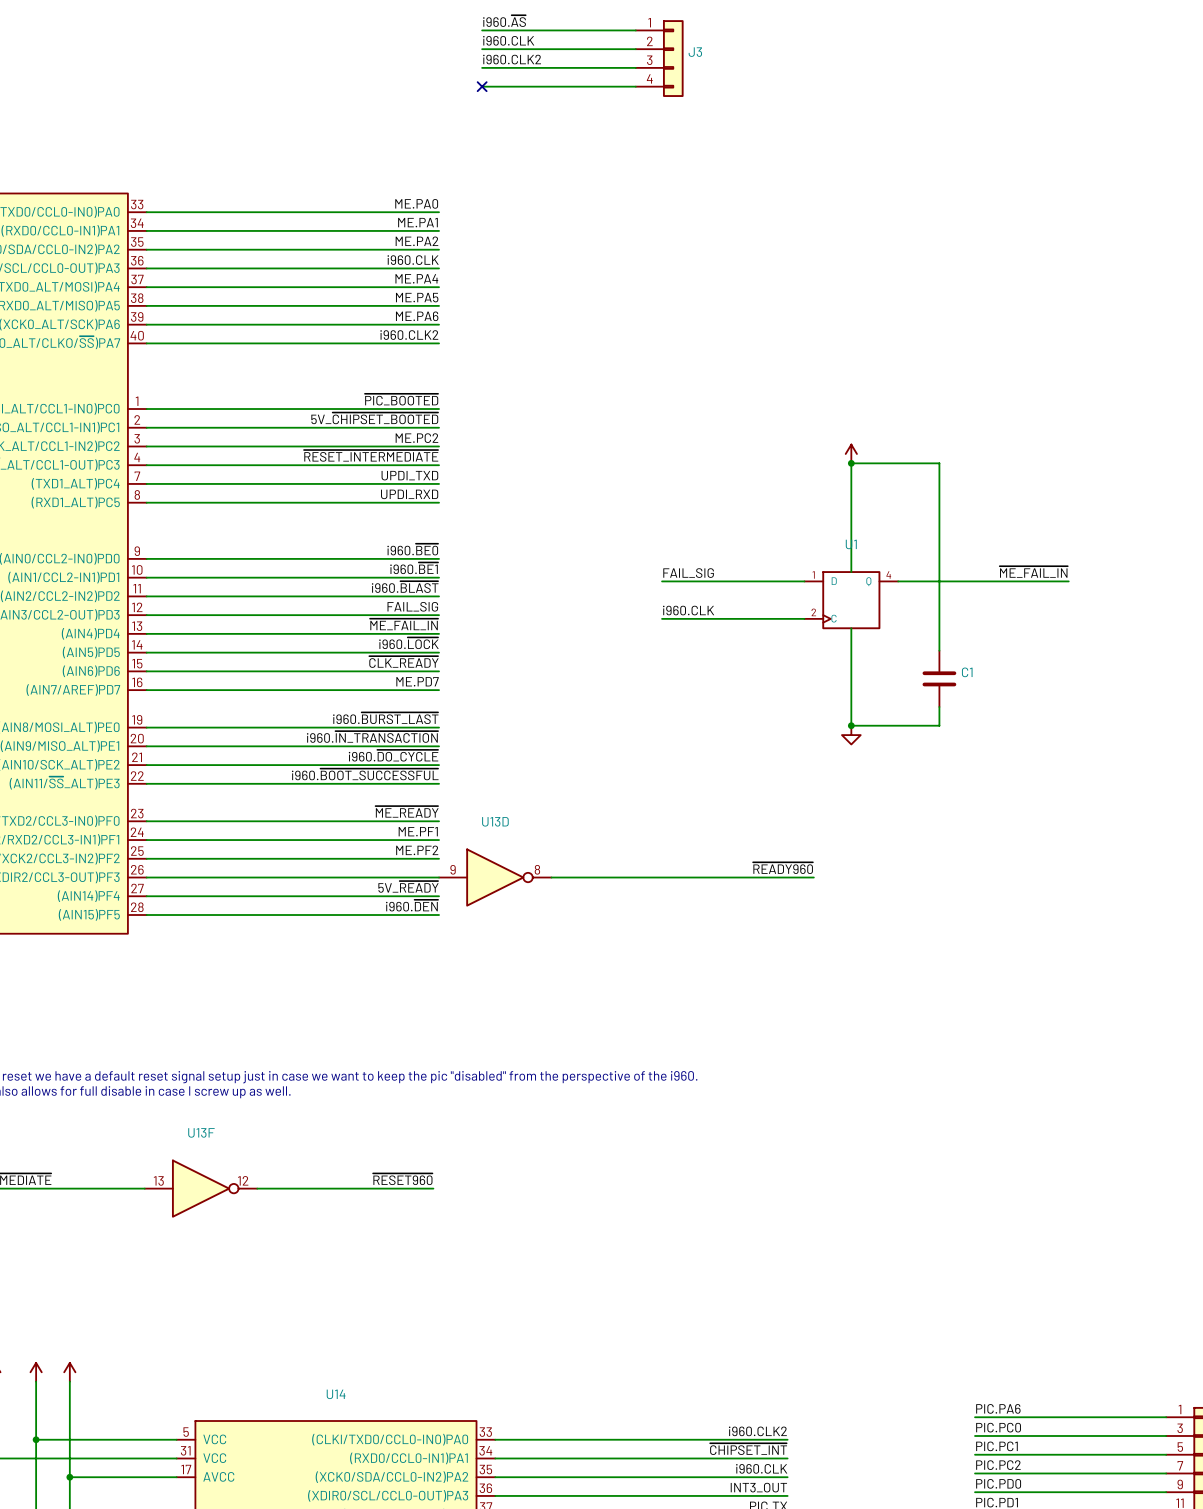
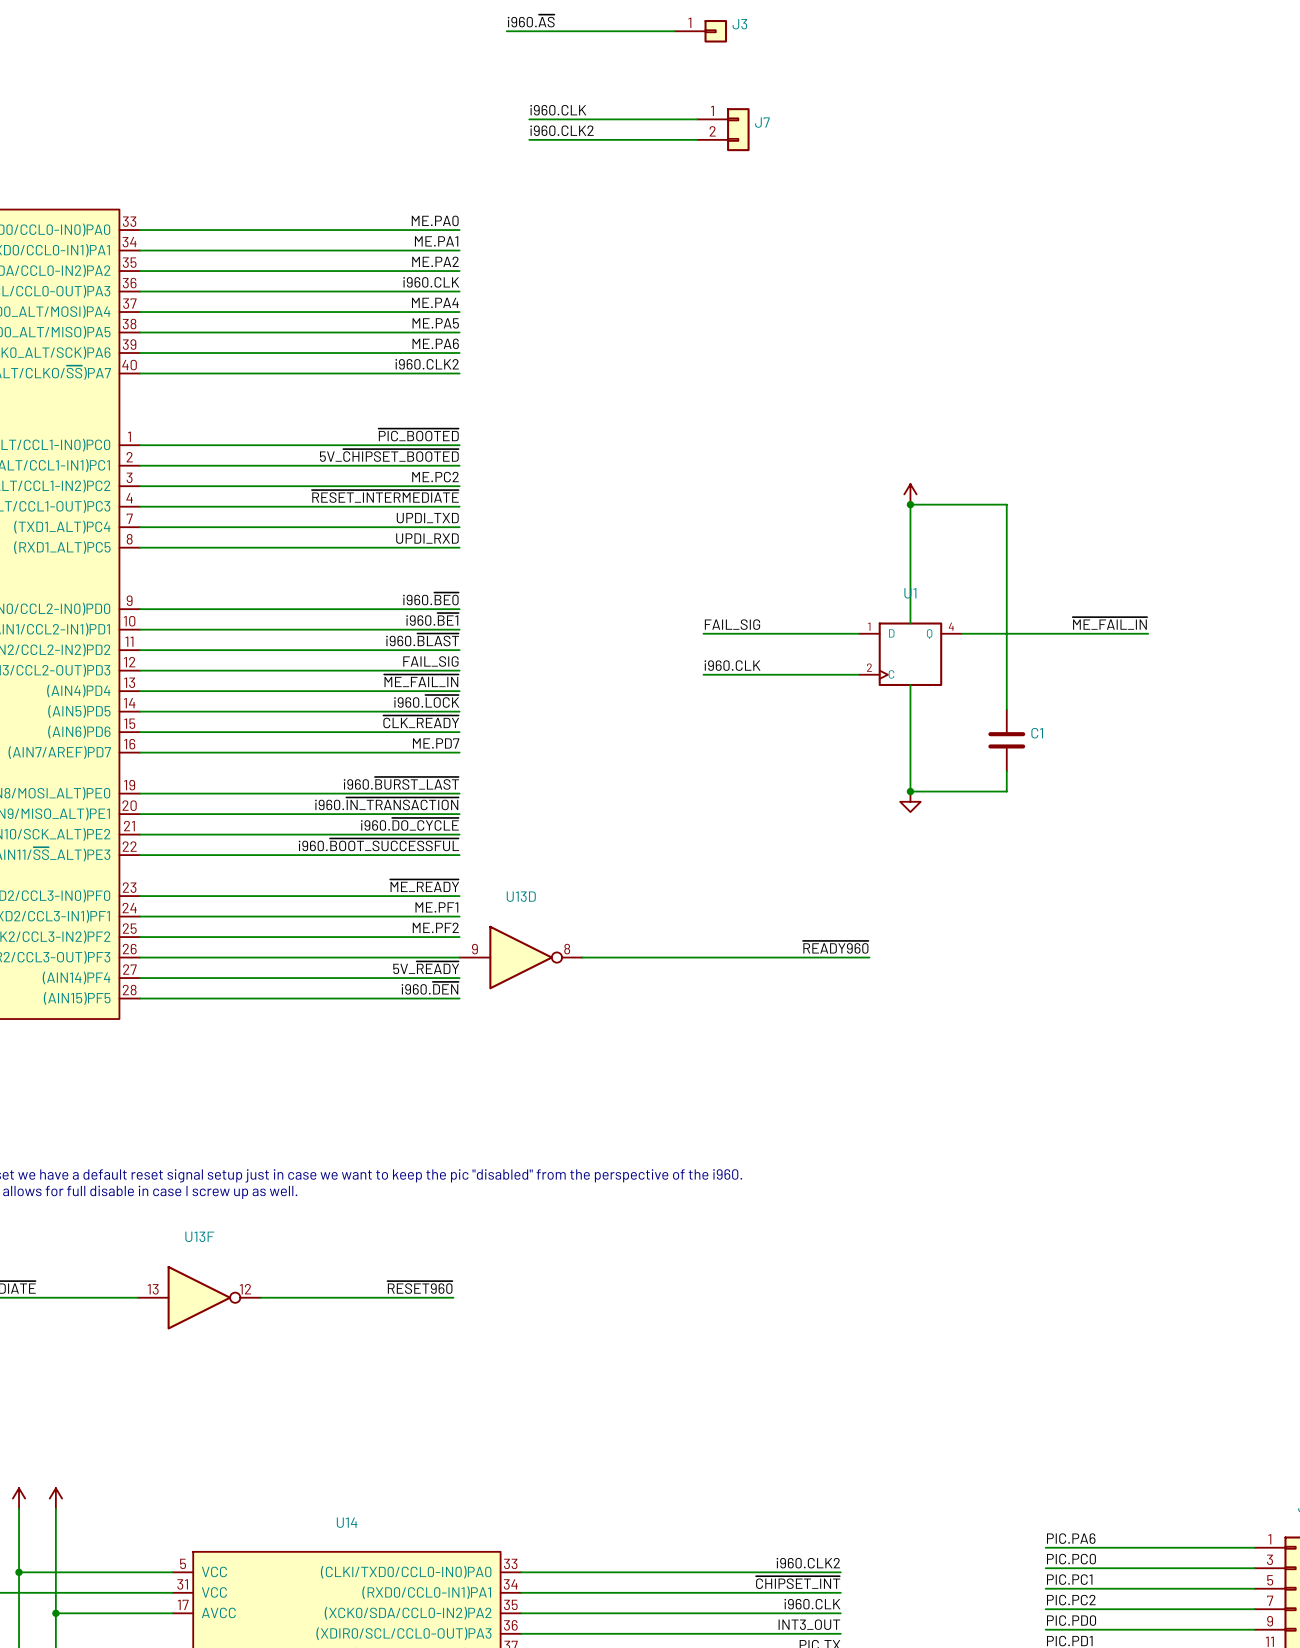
J3 symbol: [635, 20, 684, 97] -> [674, 19, 728, 43]
label position: i960.CLK (508, 40) -> i960.CLK (558, 110)
wire: (482, 49) (635, 49) -> none
label position: i960.CLK2 (512, 59) -> i960.CLK2 (562, 130)
wire: (482, 67) (635, 67) -> (529, 139) (697, 139)
wire: (482, 86) (635, 86) -> (529, 119) (697, 119)
no-connect mark: (482, 86) -> none
J7: none -> (723, 129)

